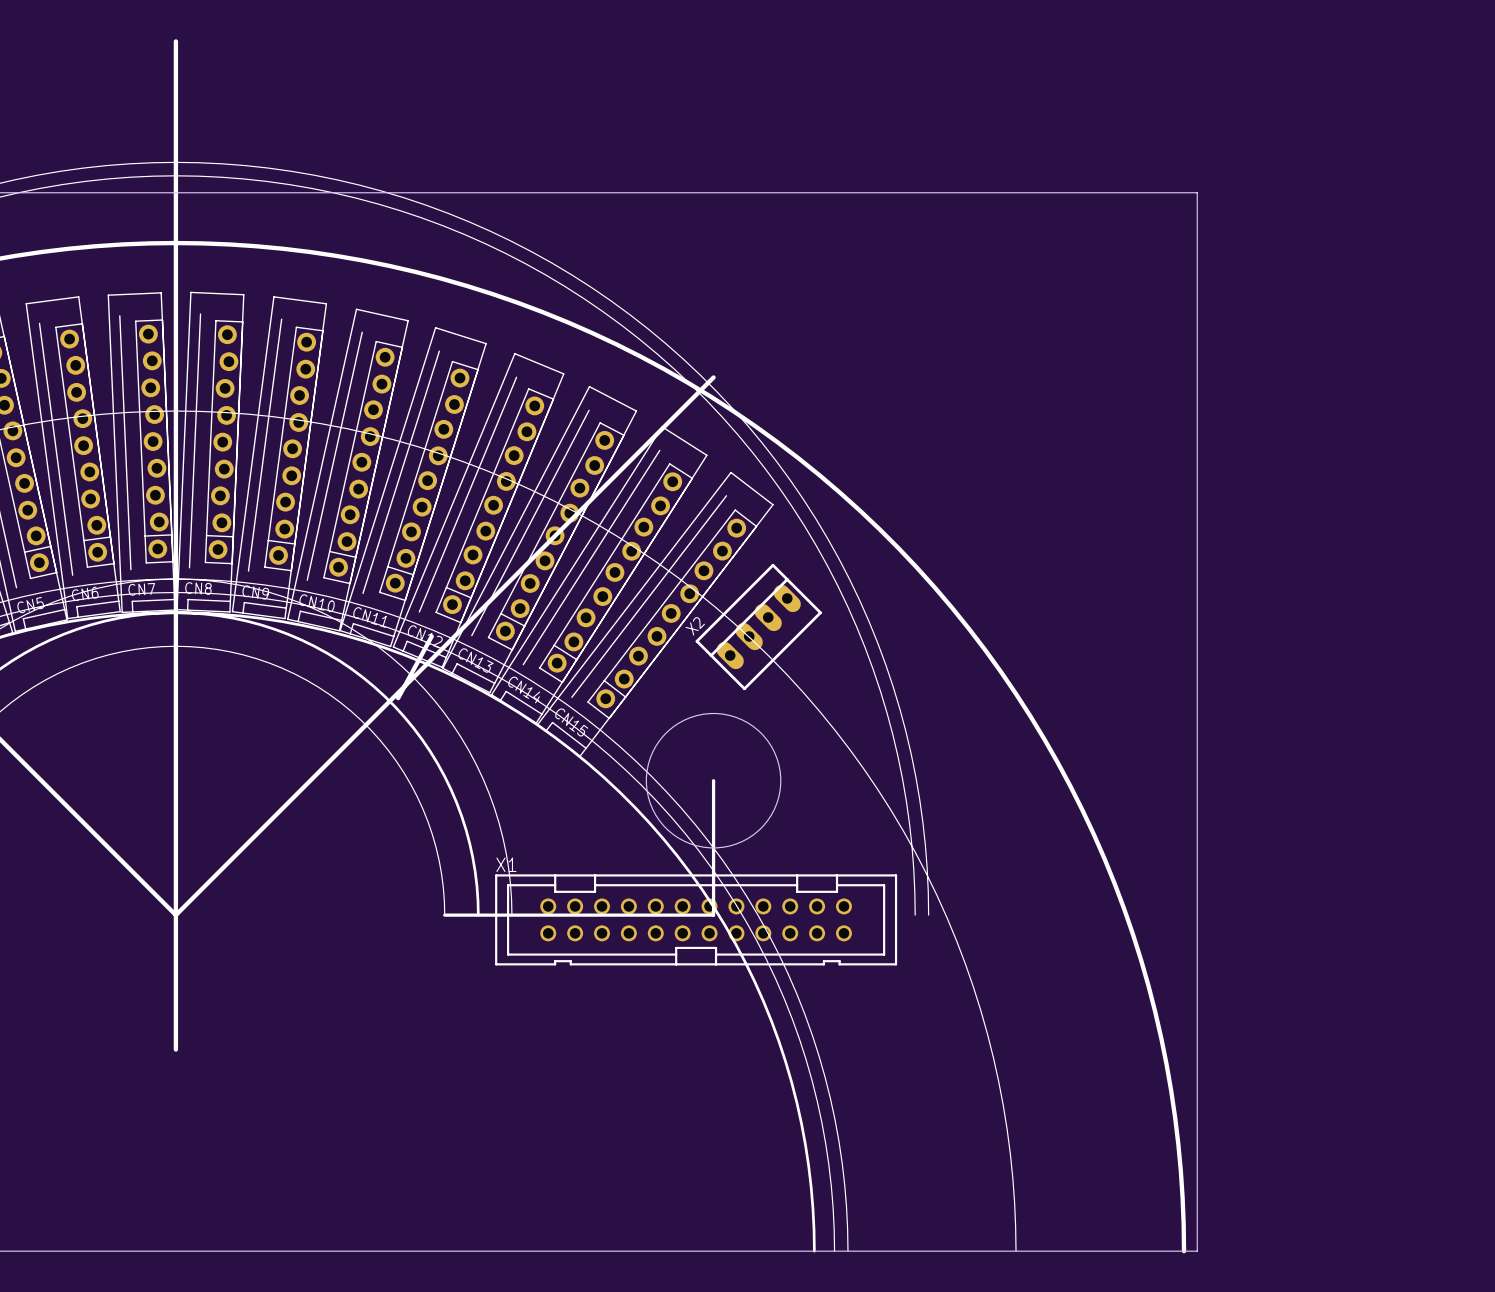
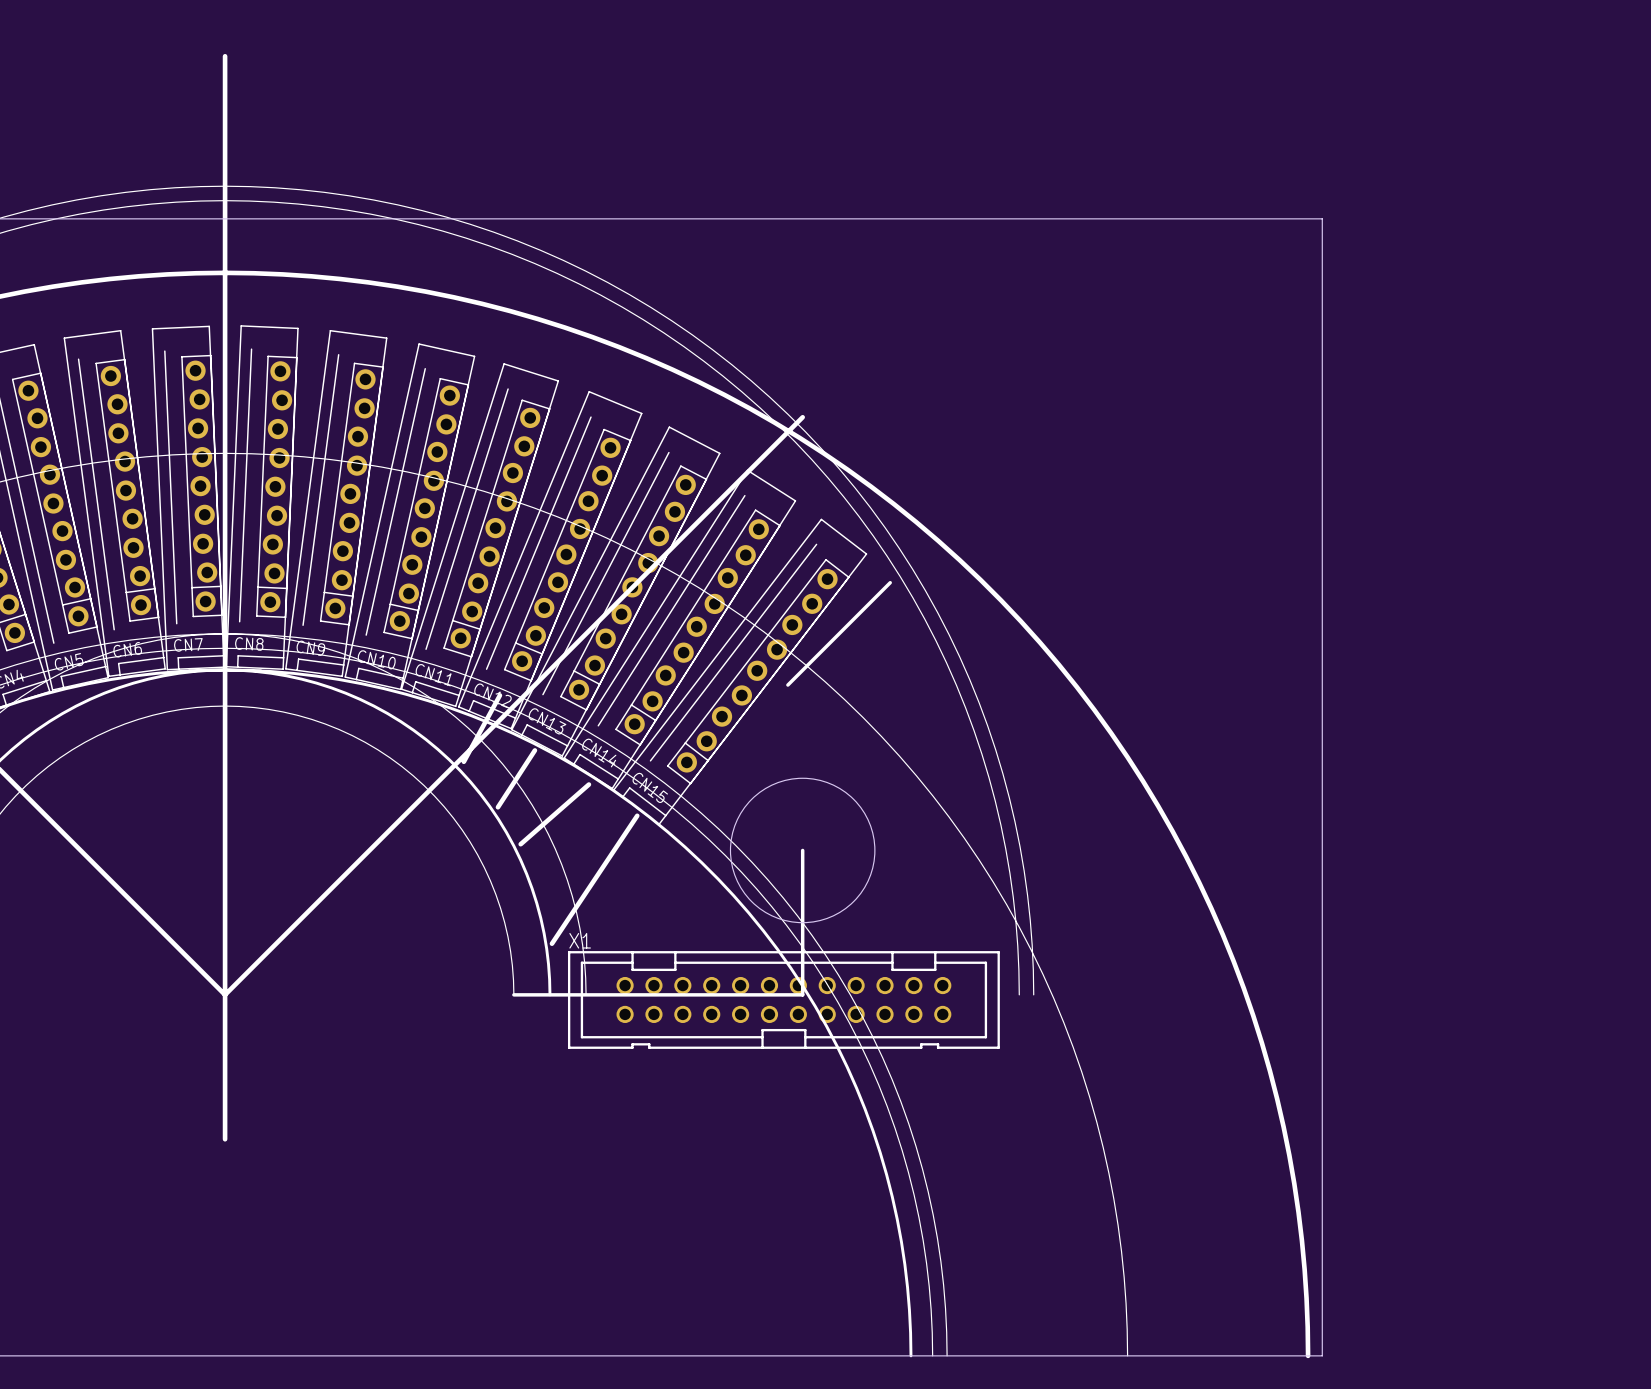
line: none -> (890, 582) (787, 685)
X2: (758, 627) -> none
line: none -> (534, 750) (497, 807)
line: none -> (588, 784) (520, 844)
line: none -> (637, 815) (551, 943)

